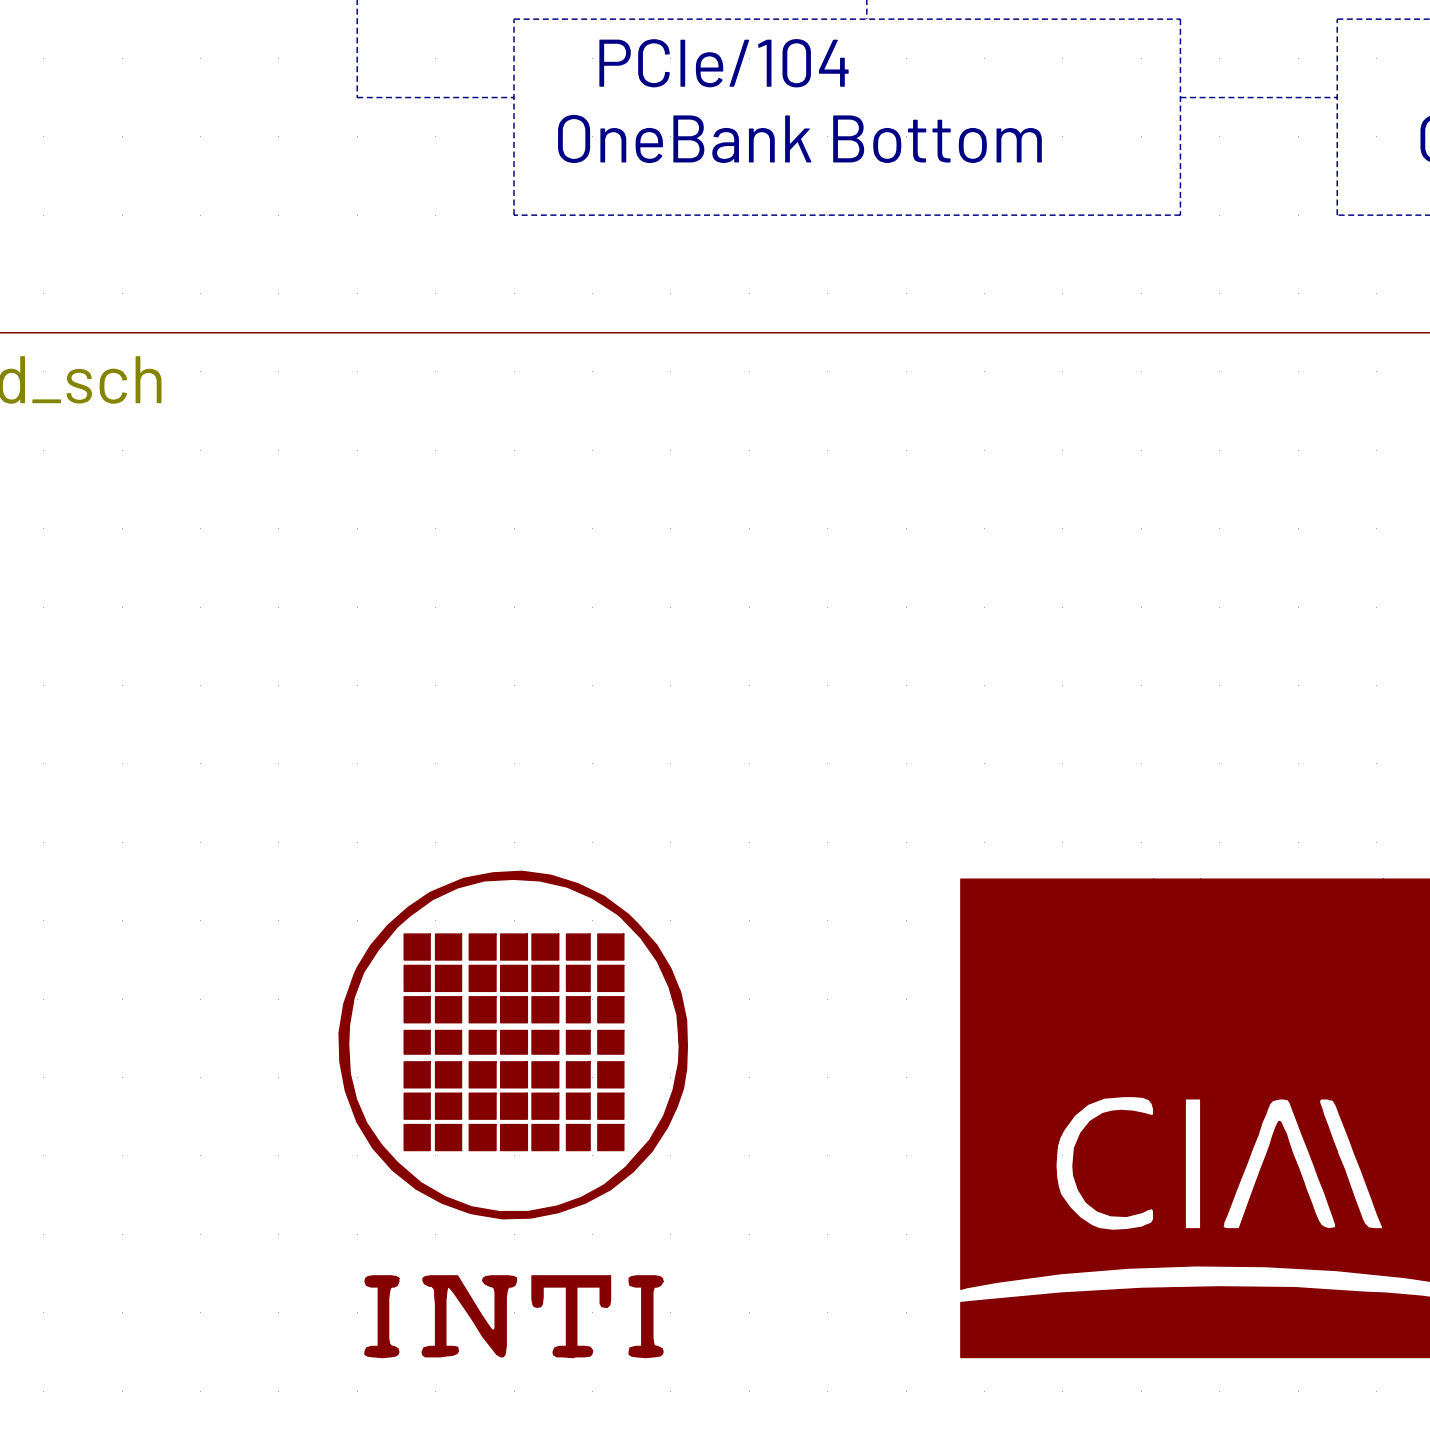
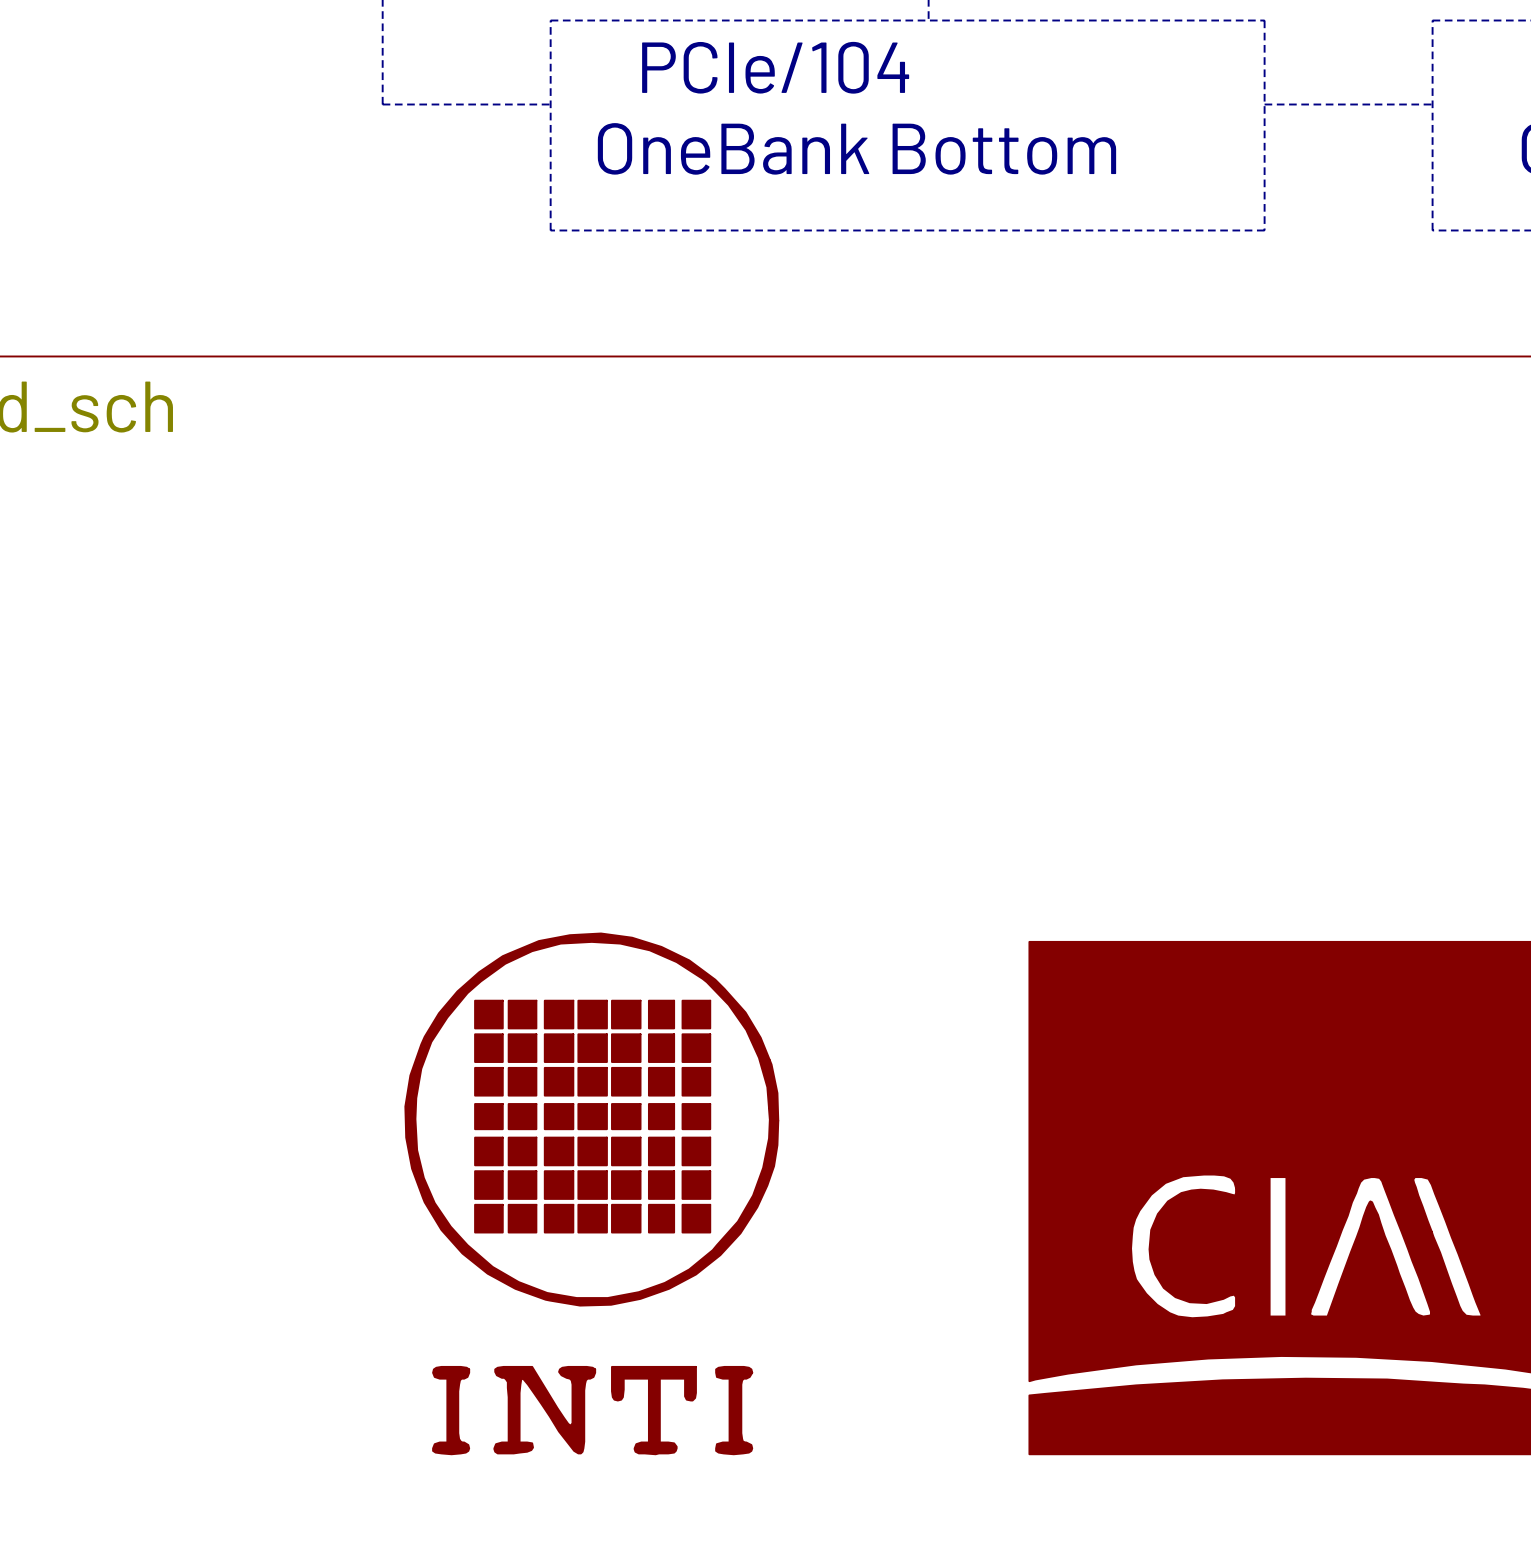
part position: (513, 1114) -> (591, 1193)

